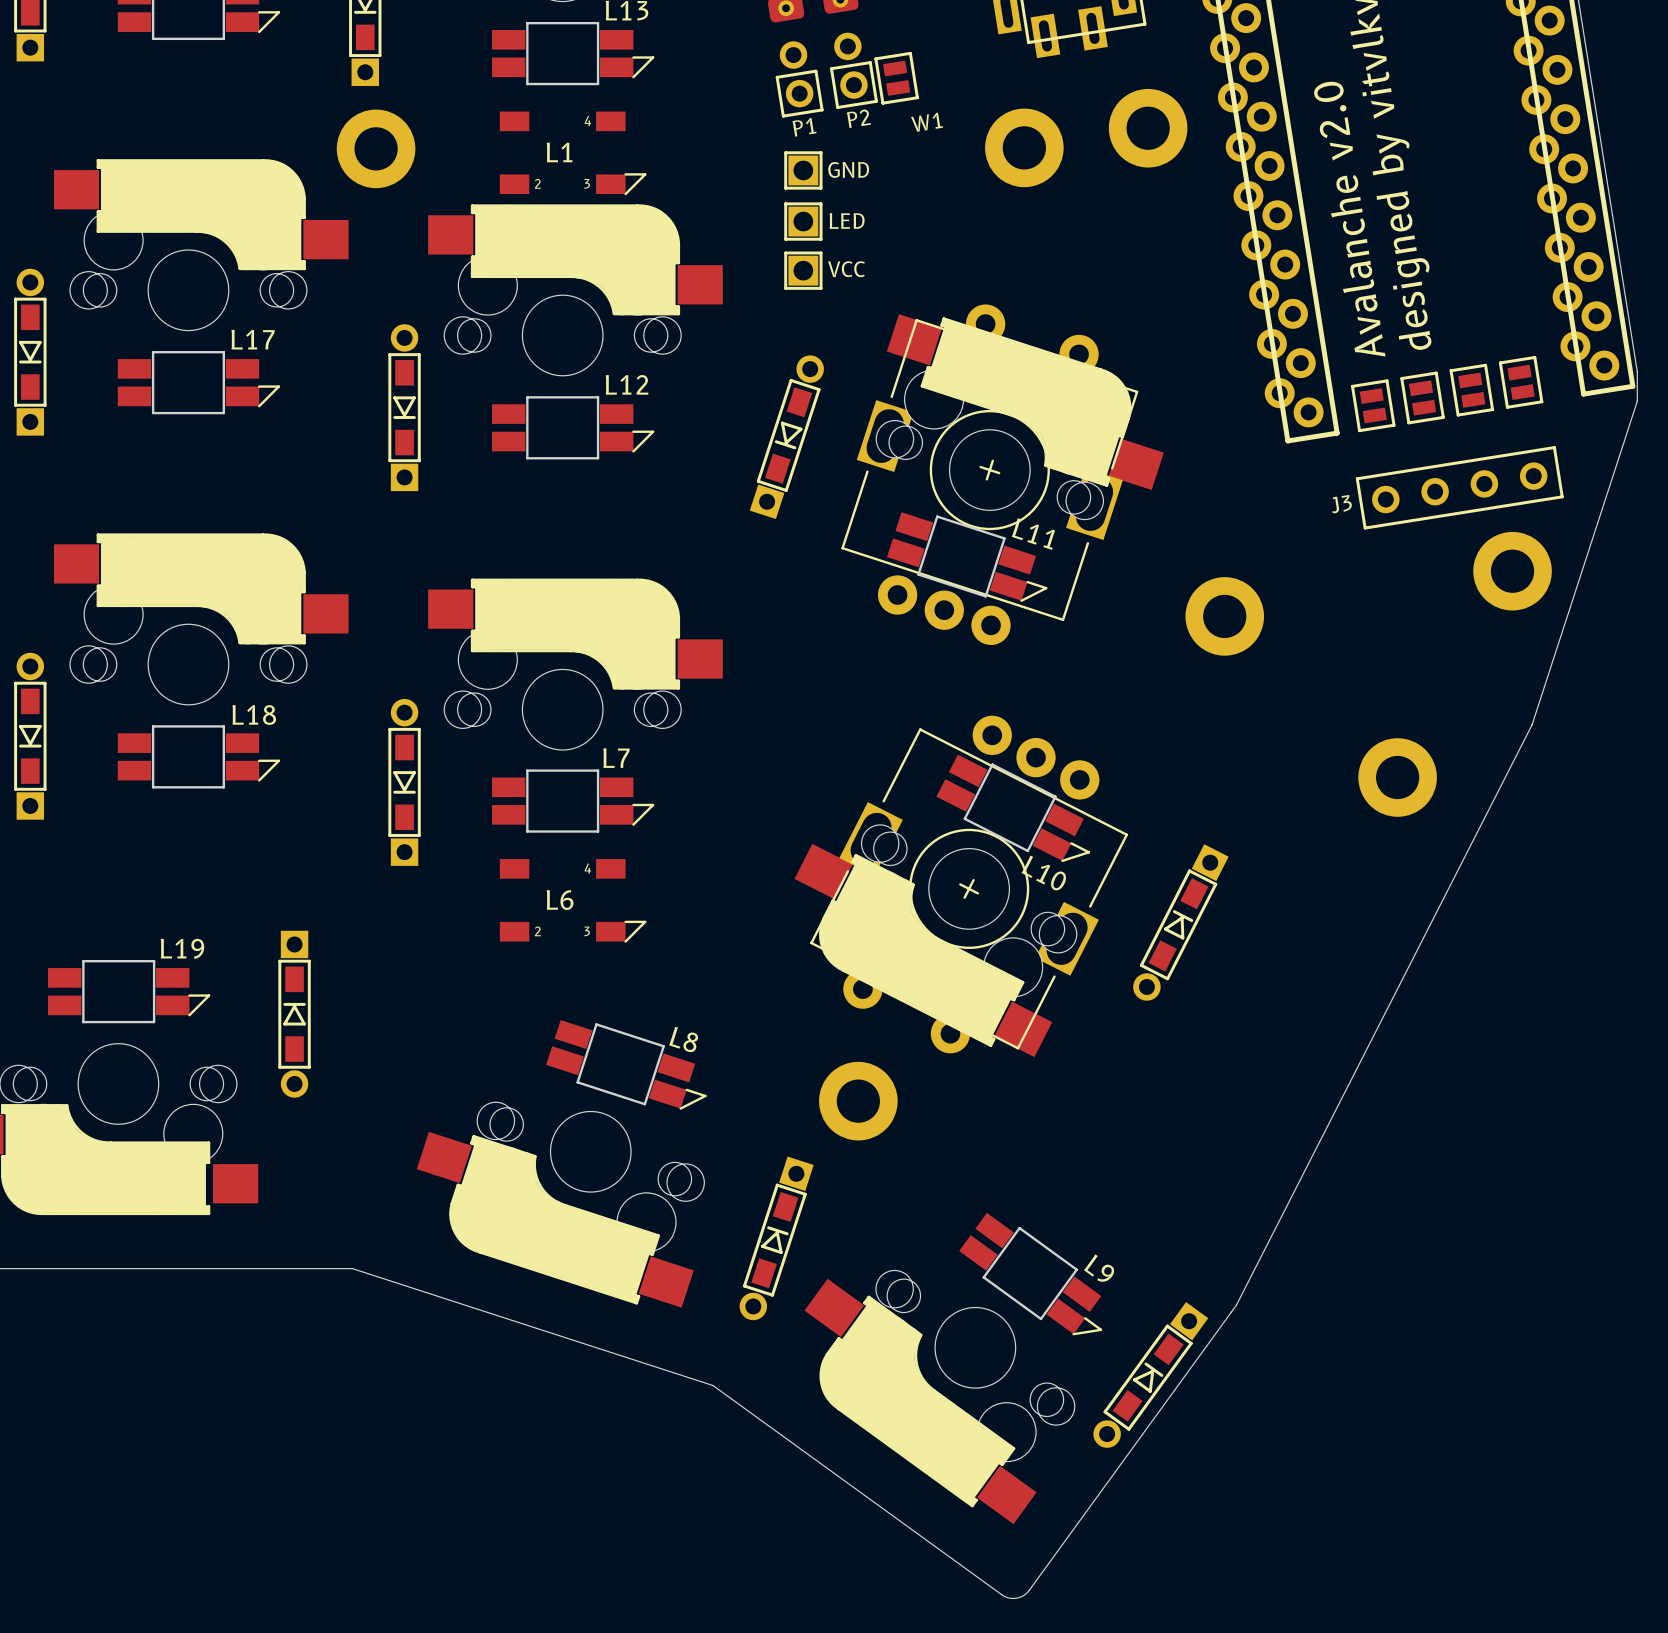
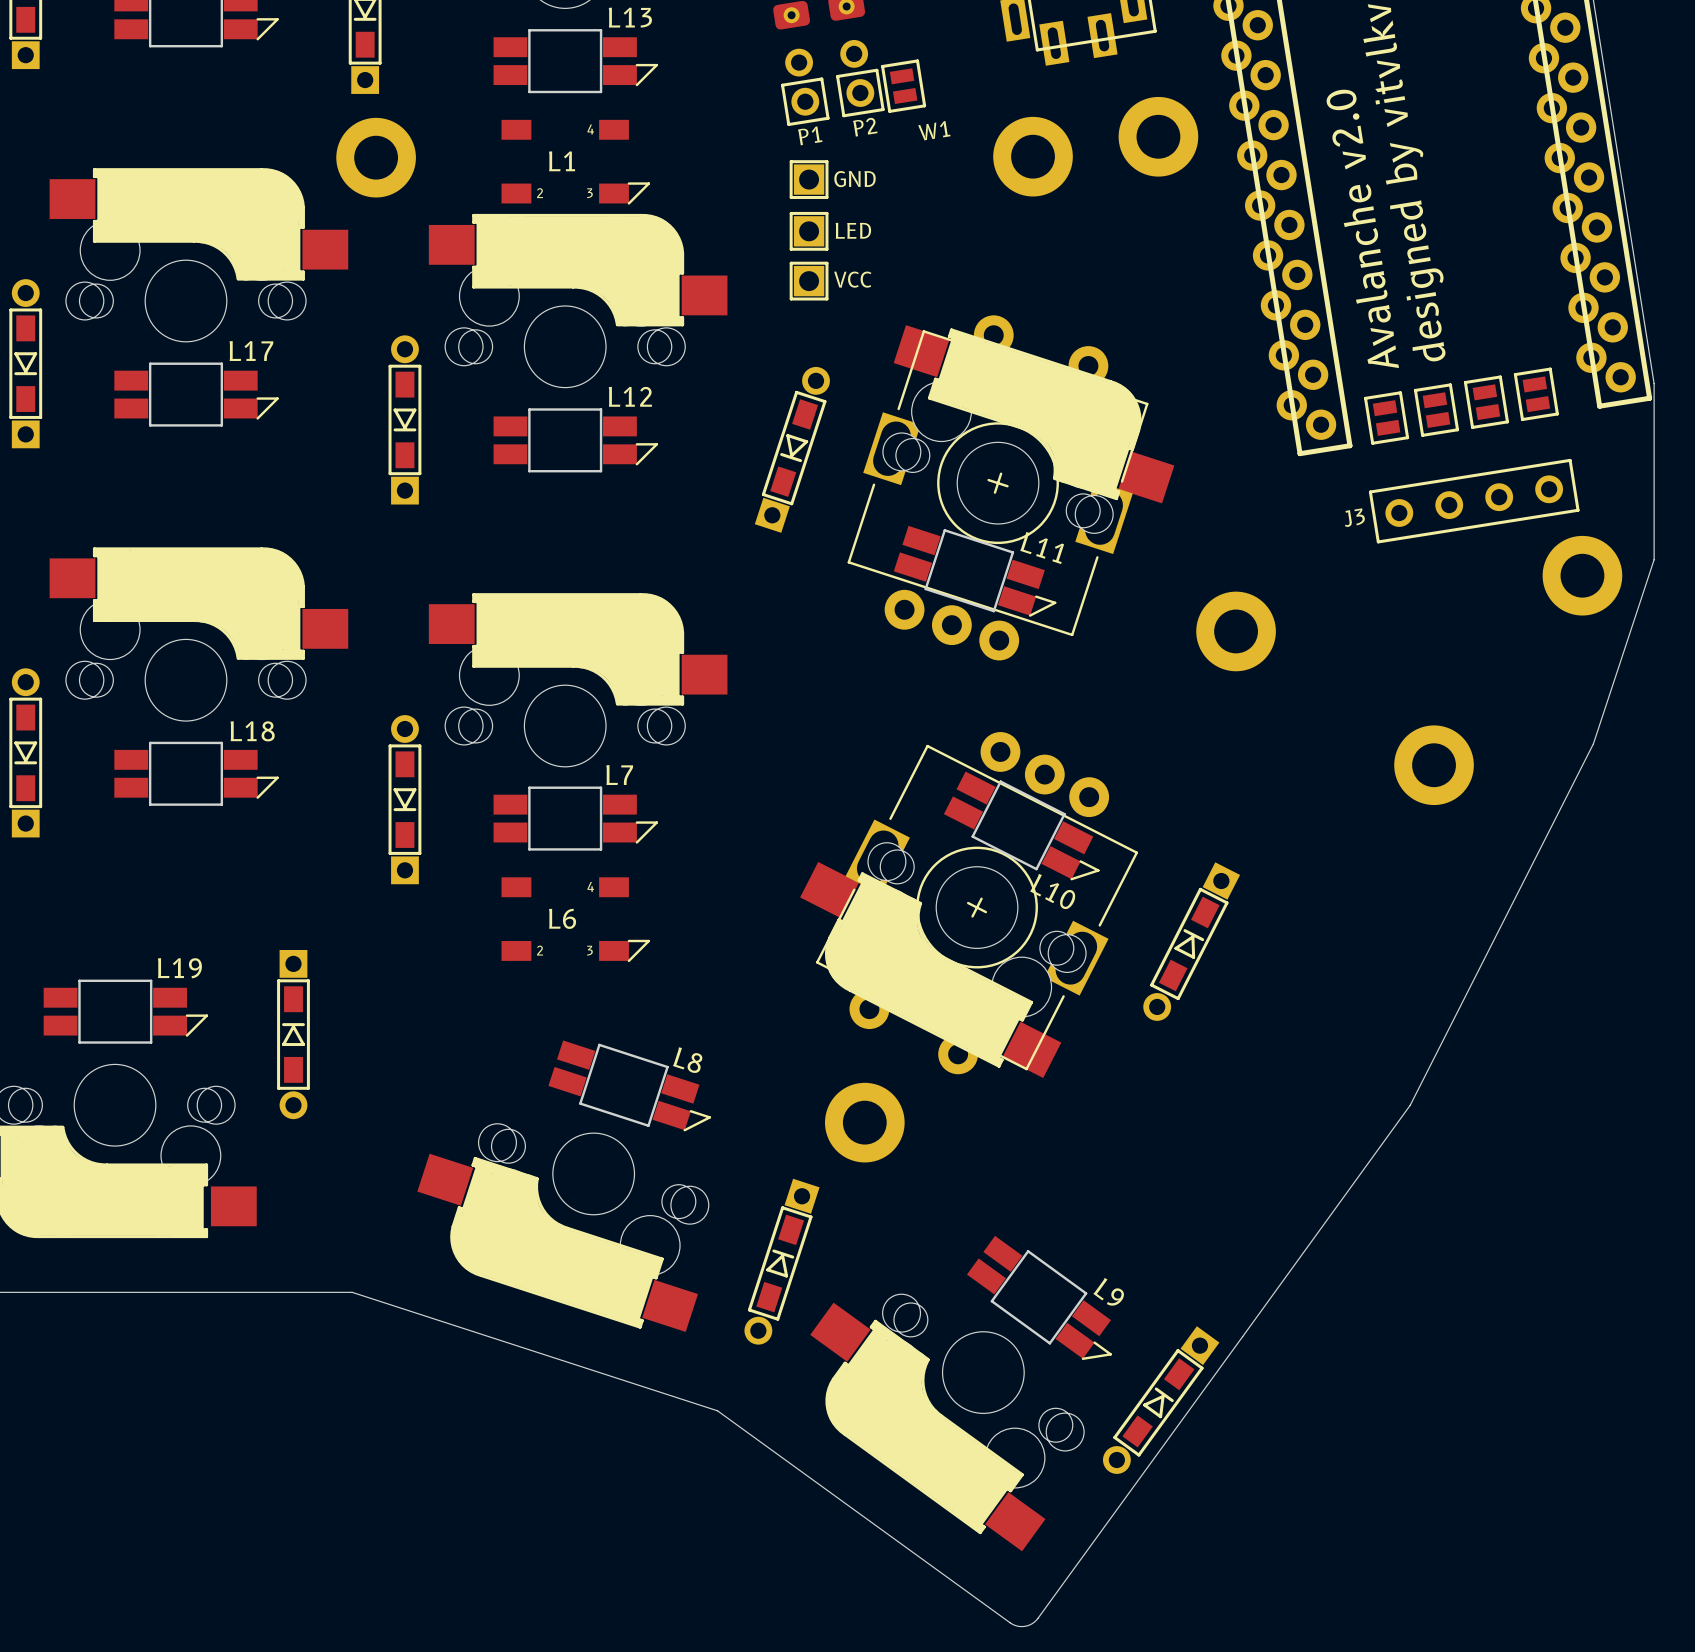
board edge: (1637, 401) (1531, 725) (1231, 1312) -> (1654, 413) (1654, 559) (1593, 743) (1410, 1105) (1242, 1336)
part position: (1512, 571) -> (1582, 575)
part position: (1397, 777) -> (1434, 765)

